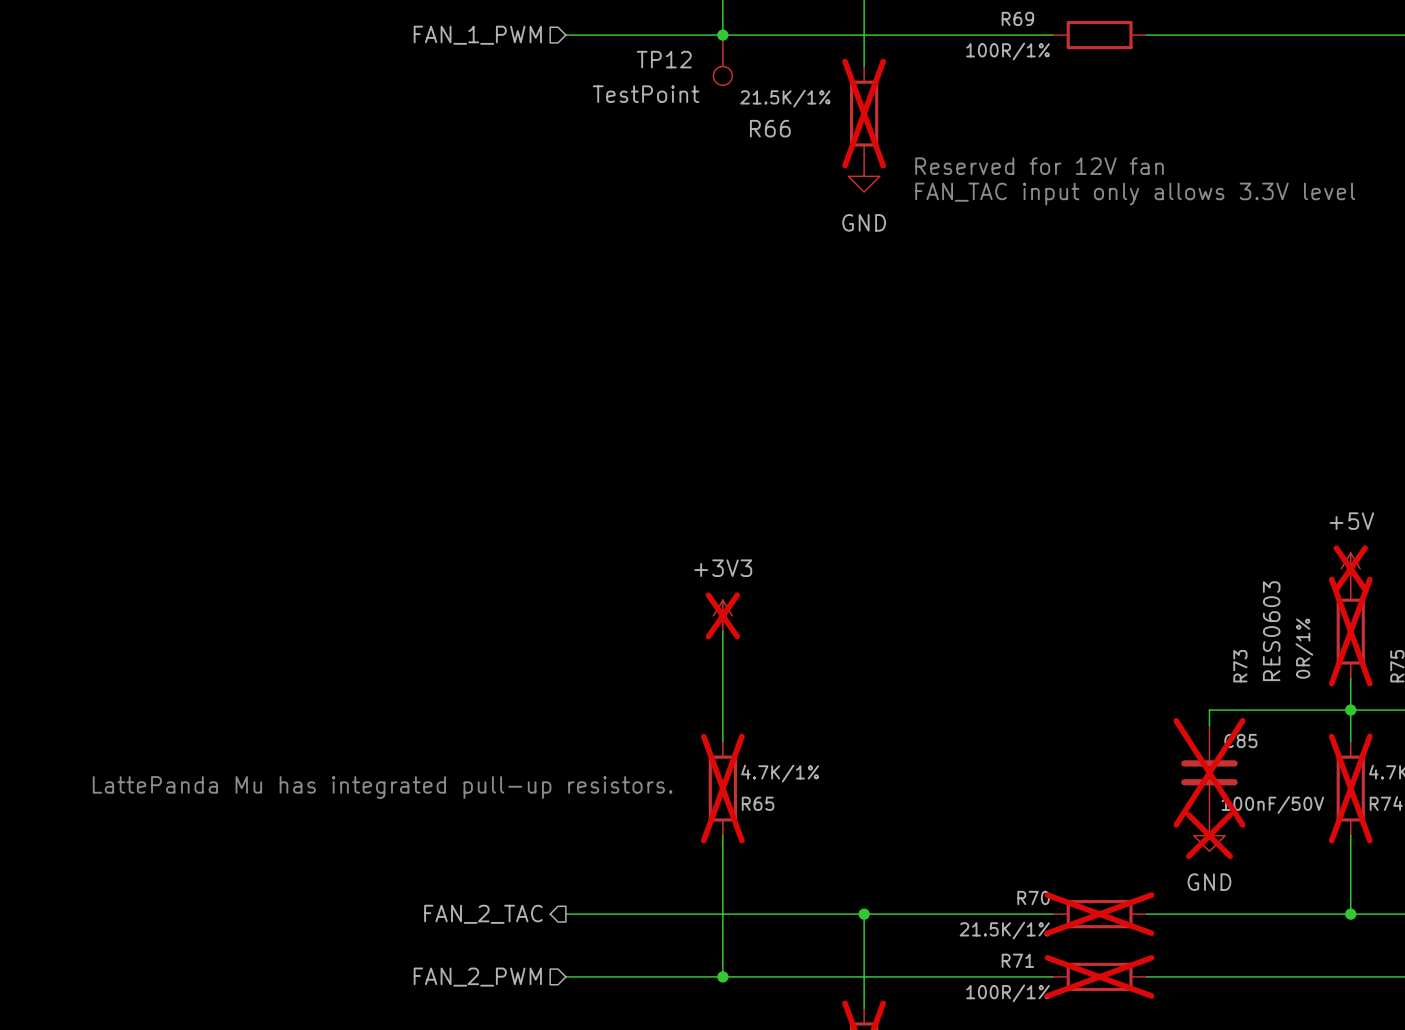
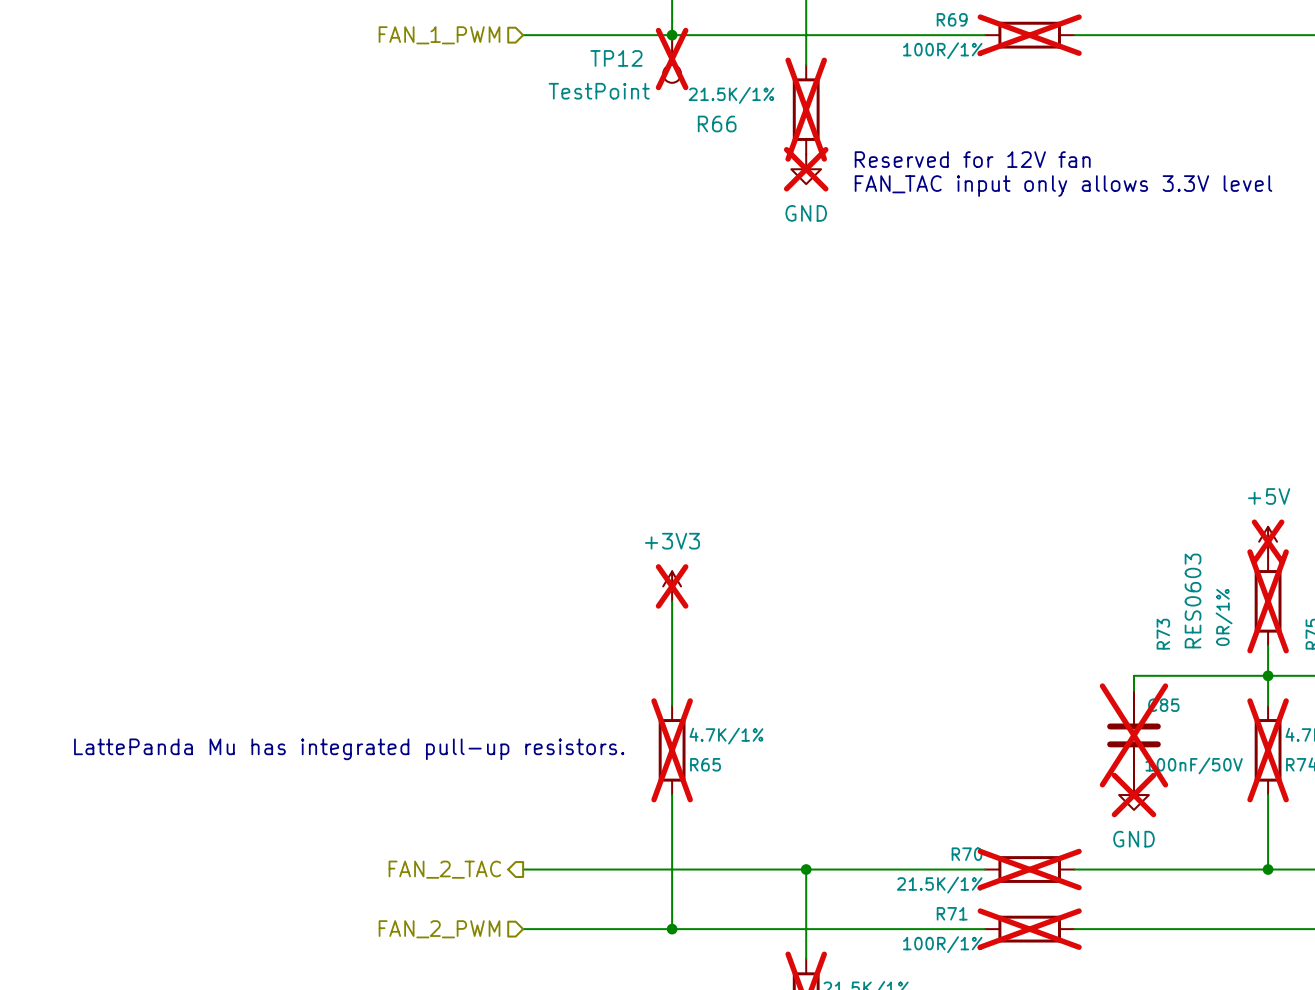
R69 do-not-place cross: none -> (1029, 35)
TP12 do-not-place cross: none -> (672, 58)
power symbol do-not-place cross: none -> (806, 169)

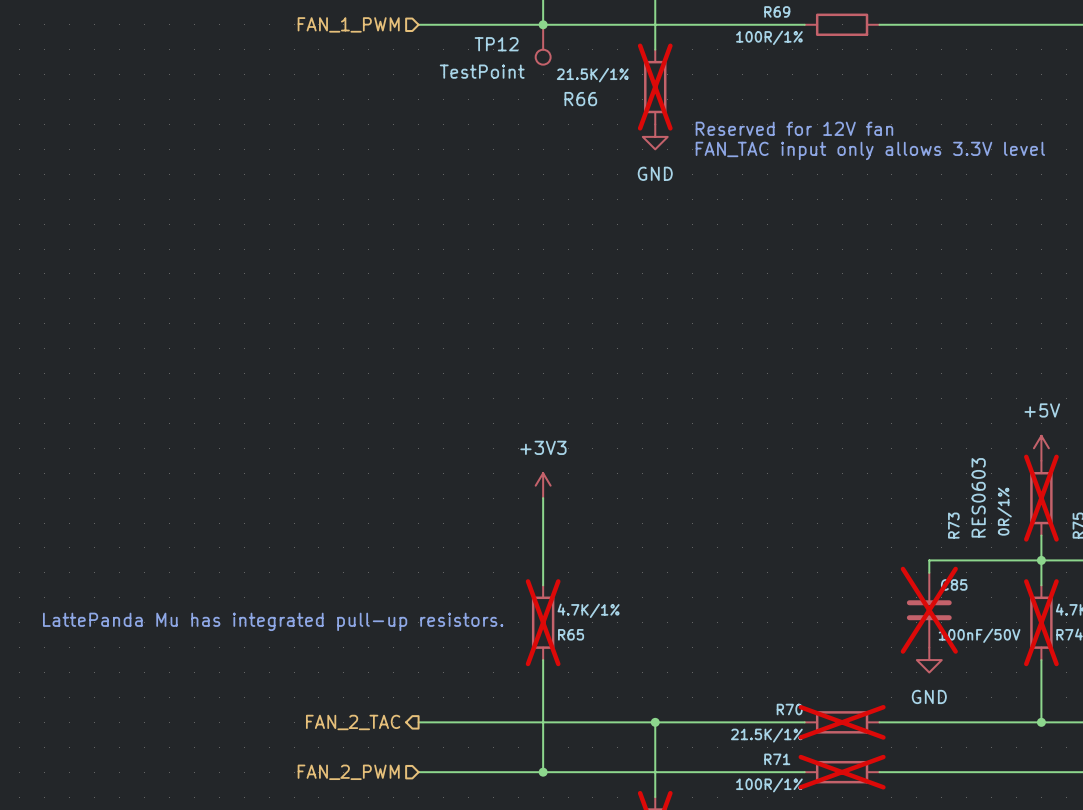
R69 do-not-place cross: (1029, 35) -> none
TP12 do-not-place cross: (672, 58) -> none
power symbol do-not-place cross: (806, 169) -> none
power symbol do-not-place cross: (1268, 541) -> none
power symbol do-not-place cross: (672, 586) -> none
power symbol do-not-place cross: (1133, 795) -> none

